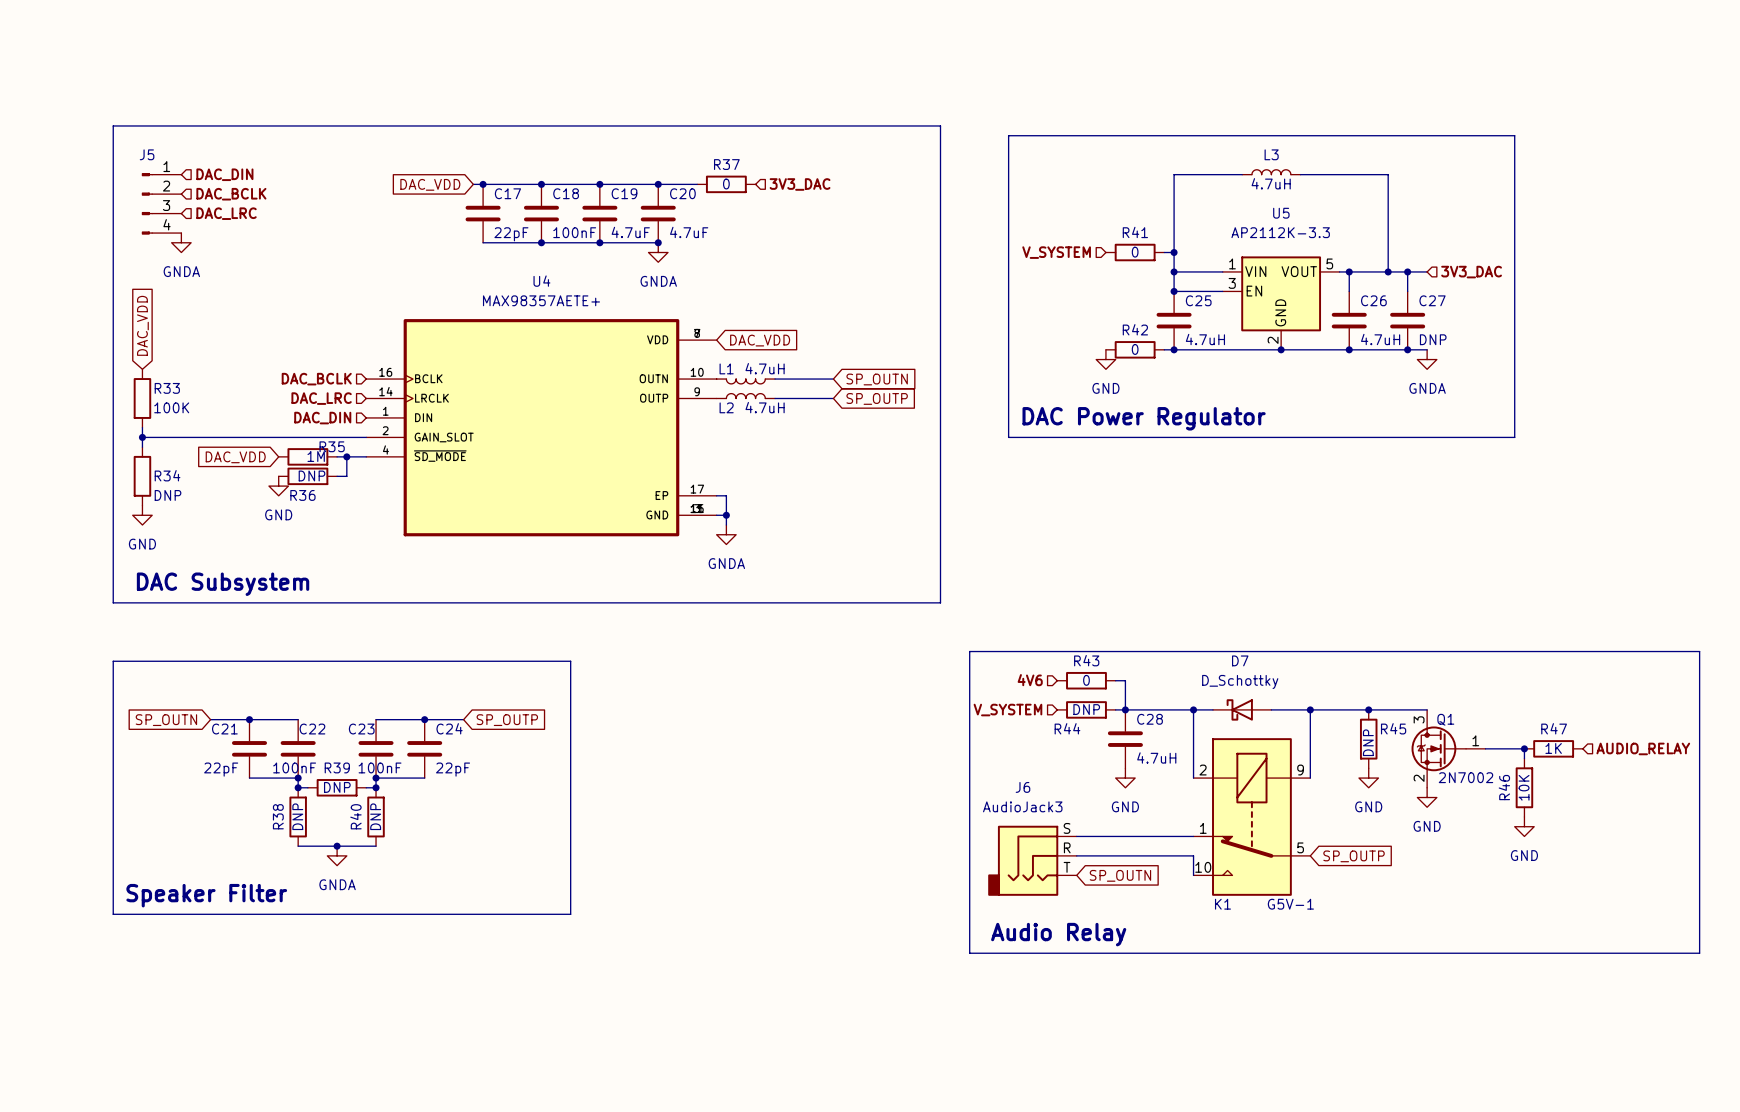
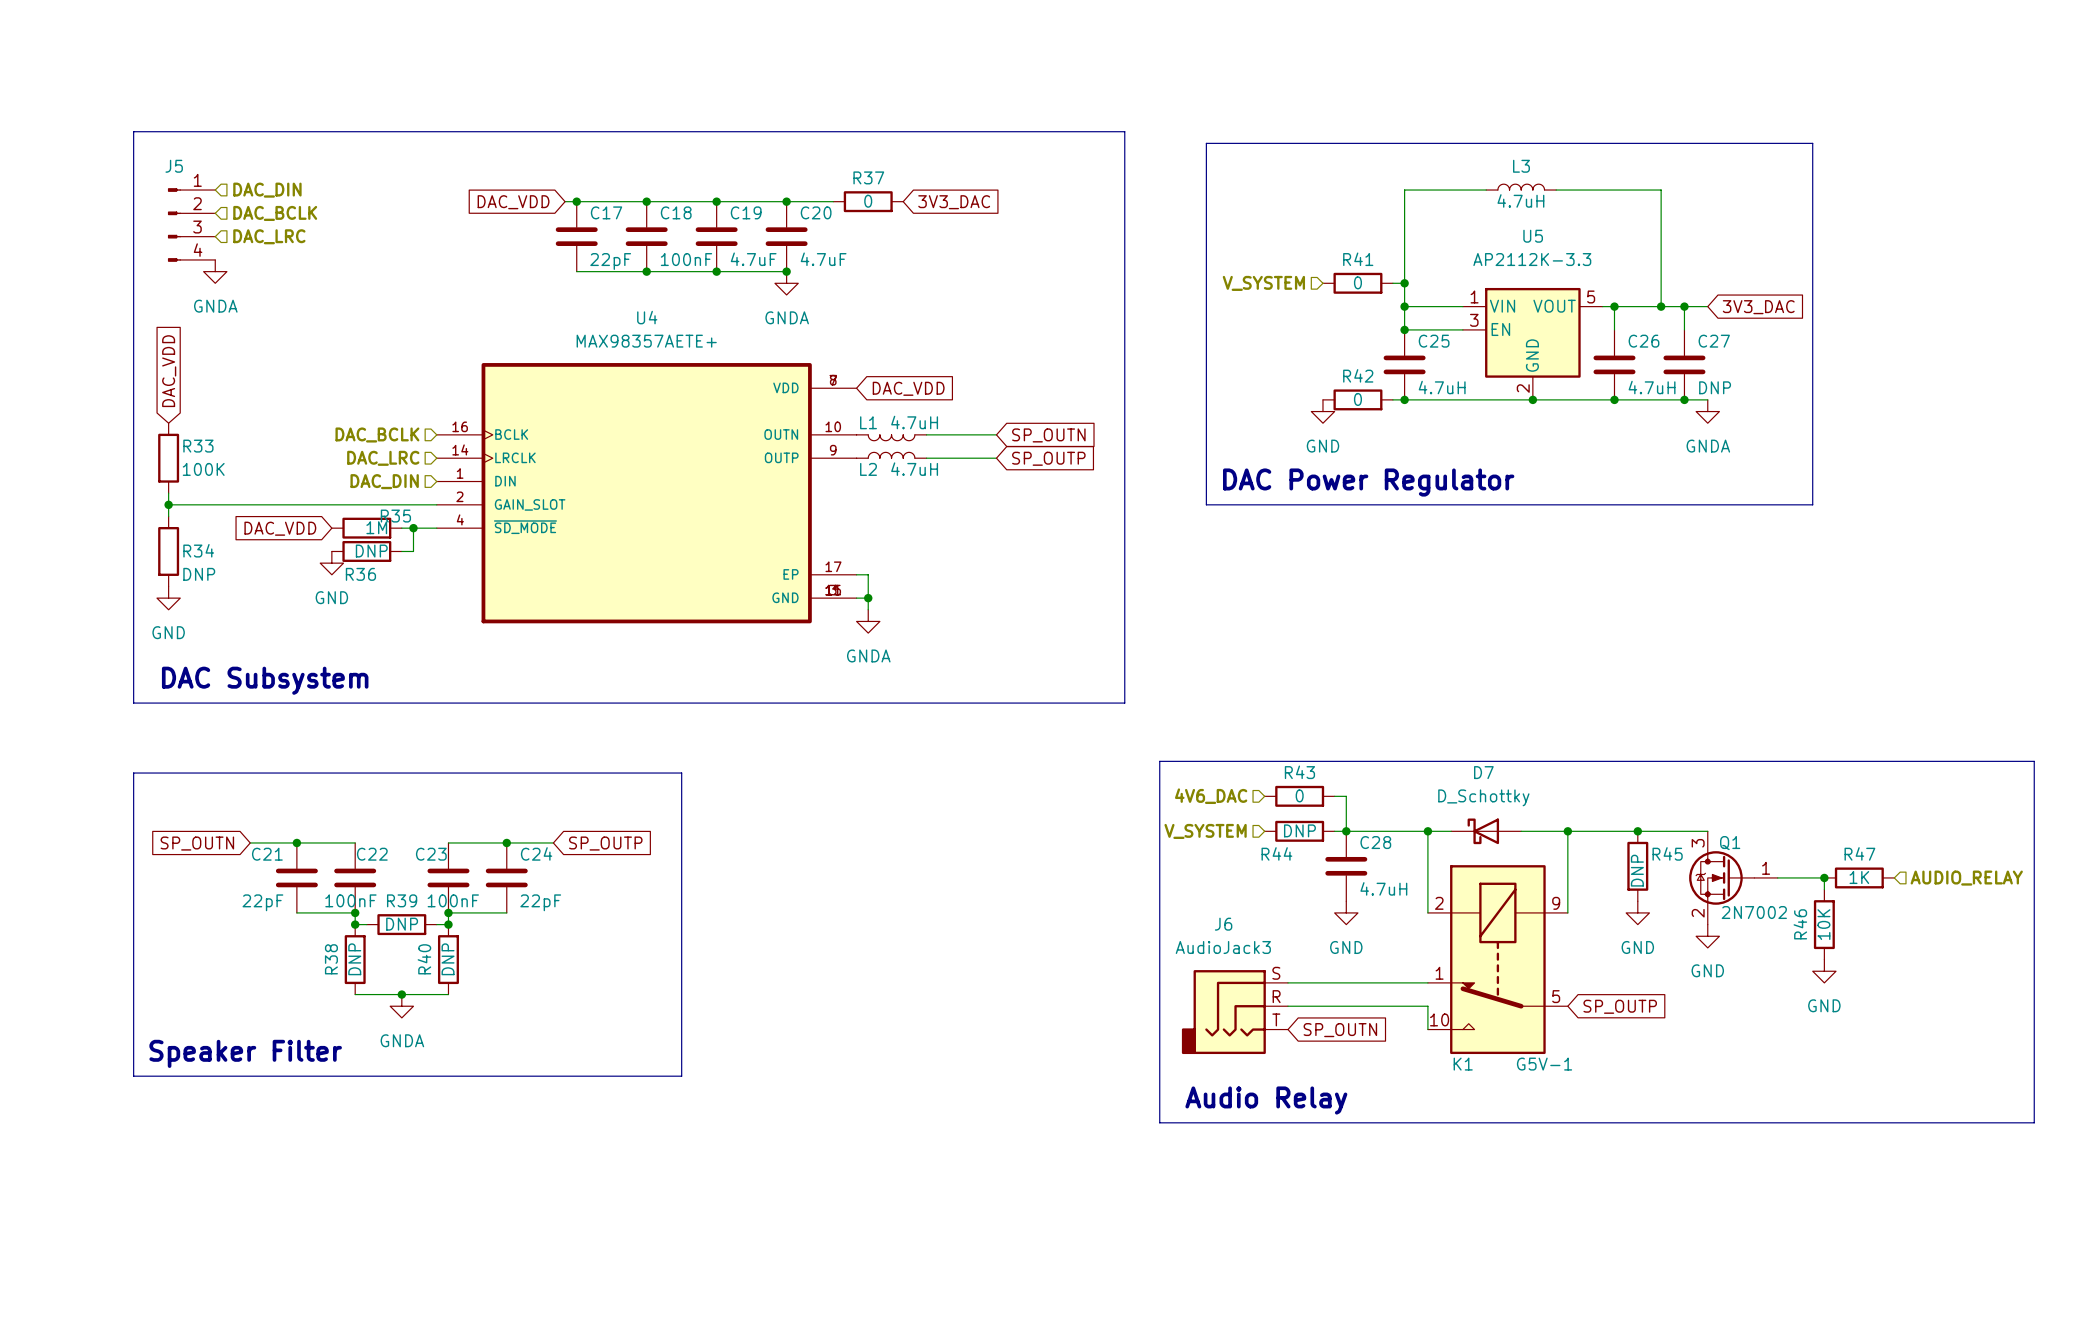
global label: none -> 3V3_DAC (954, 202)
hierarchical label: 3V3_DAC (800, 184) -> none
global label: none -> 3V3_DAC (1758, 307)
hierarchical label: 3V3_DAC (1471, 272) -> none
hierarchical label: 4V6 (1030, 680) -> 4V6_DAC (1211, 796)

